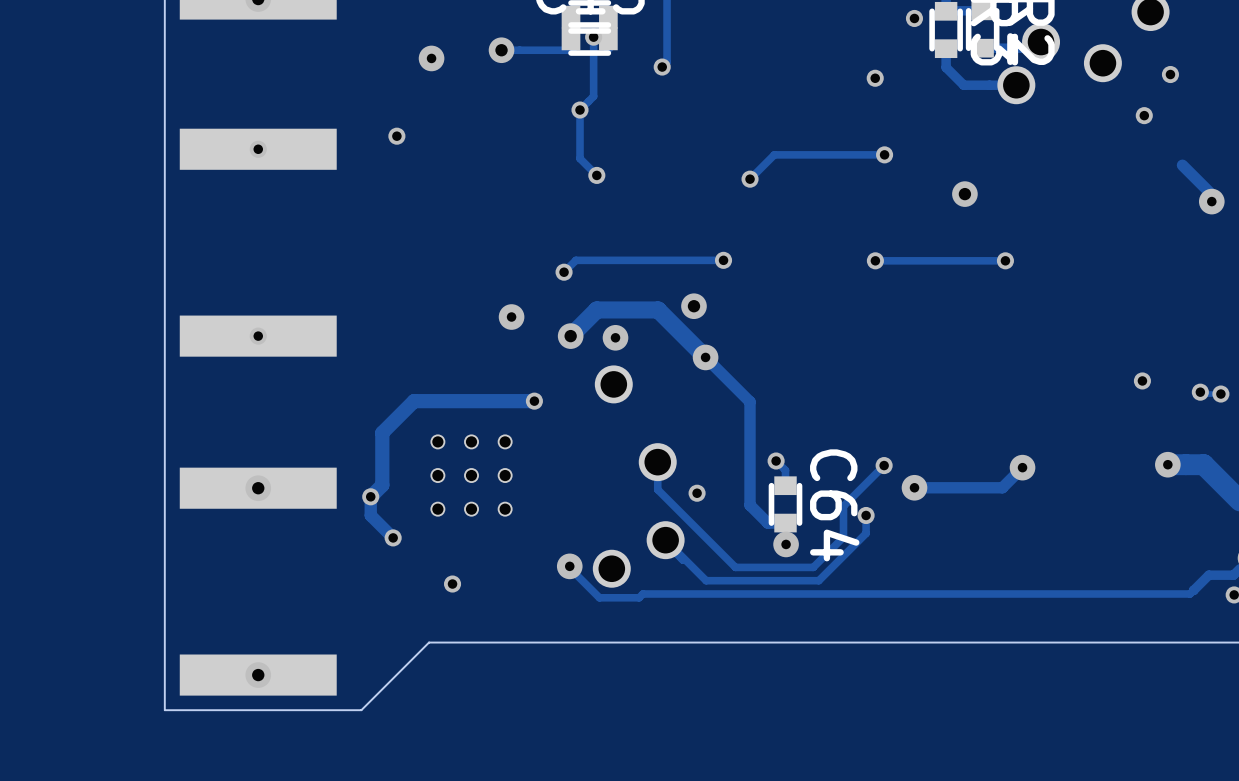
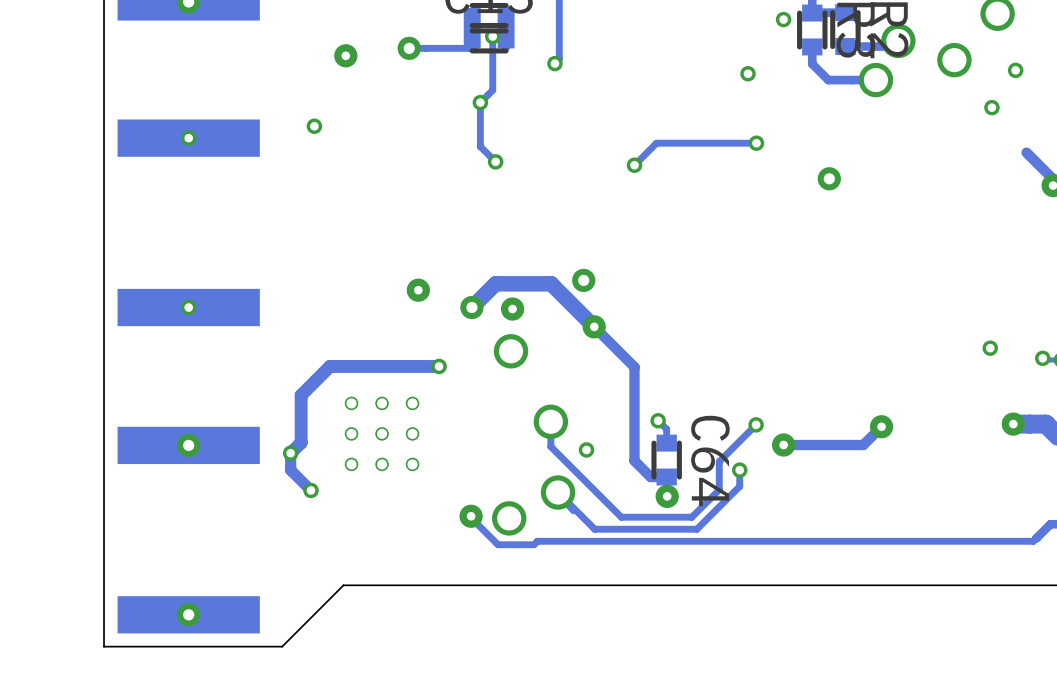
track: (723, 260) (575, 260) (564, 272) -> none
via: (723, 260) -> none
via: (875, 260) -> none
track: (1005, 260) (875, 260) -> none
via: (1005, 260) -> none
via: (564, 272) -> none
via: (452, 584) -> none

